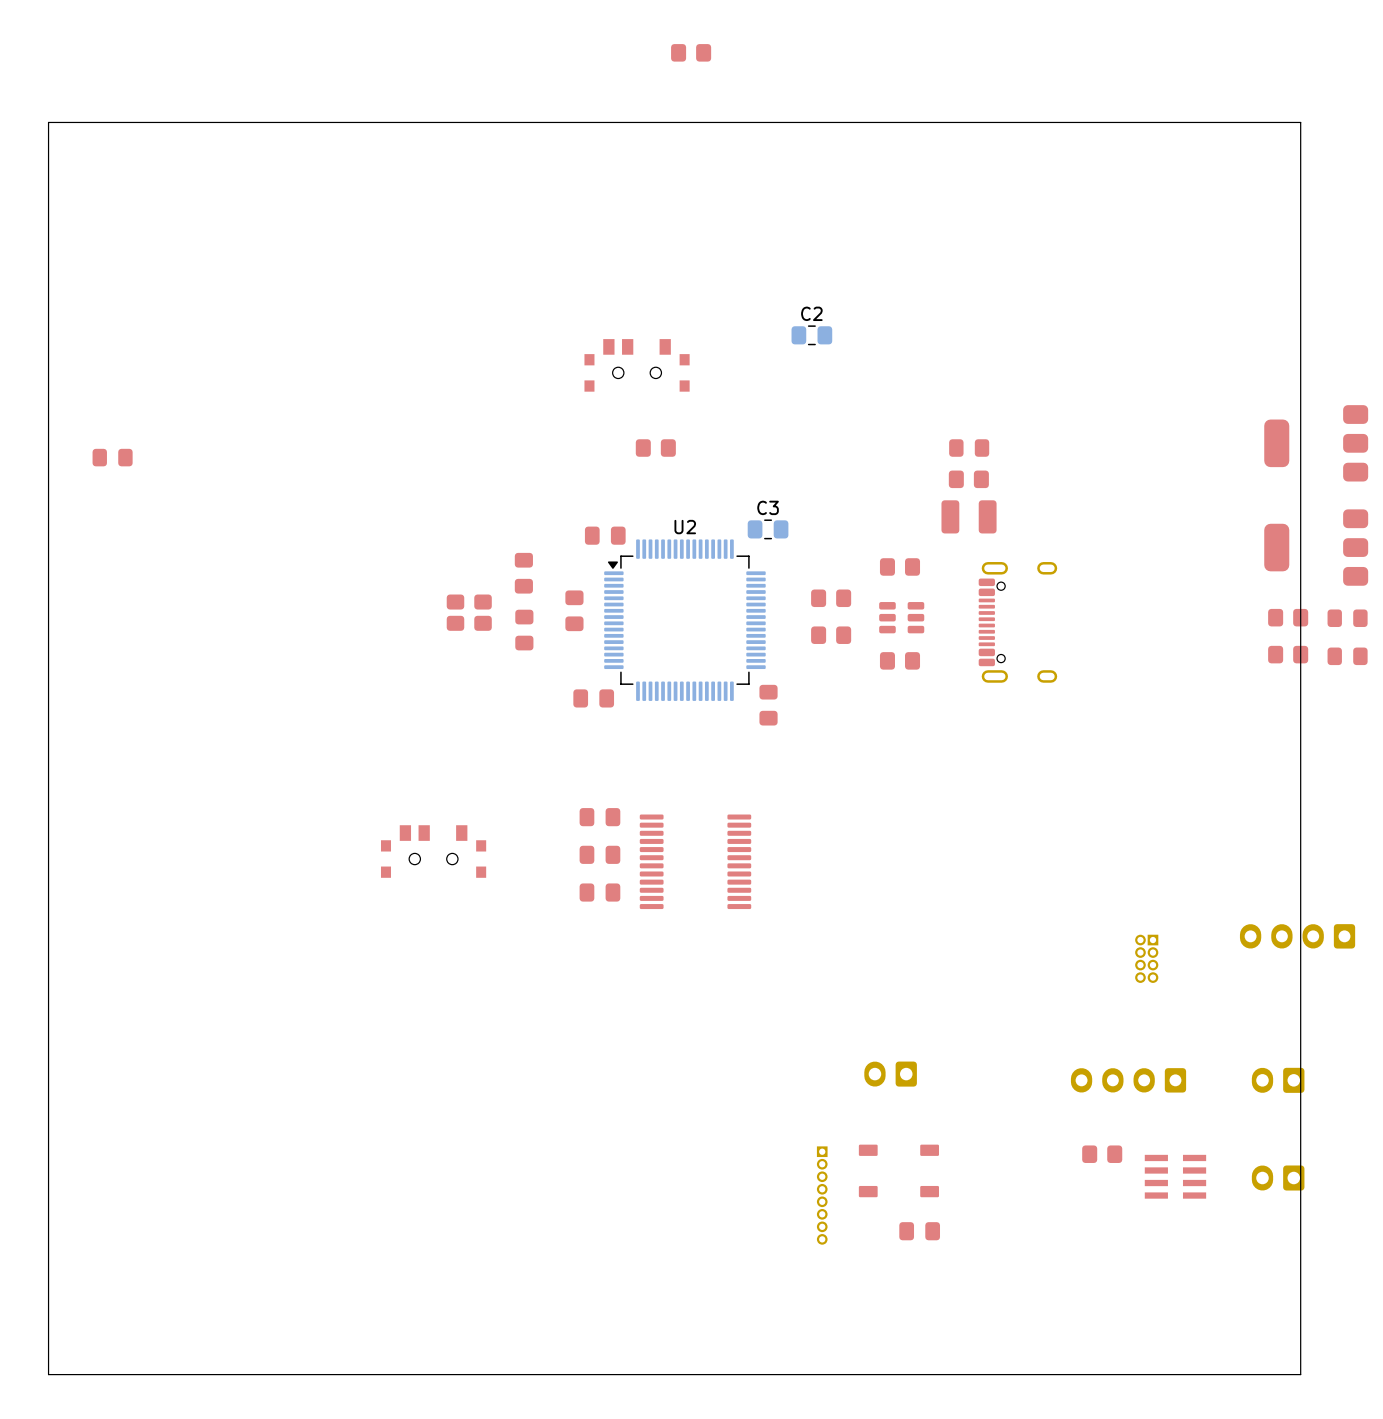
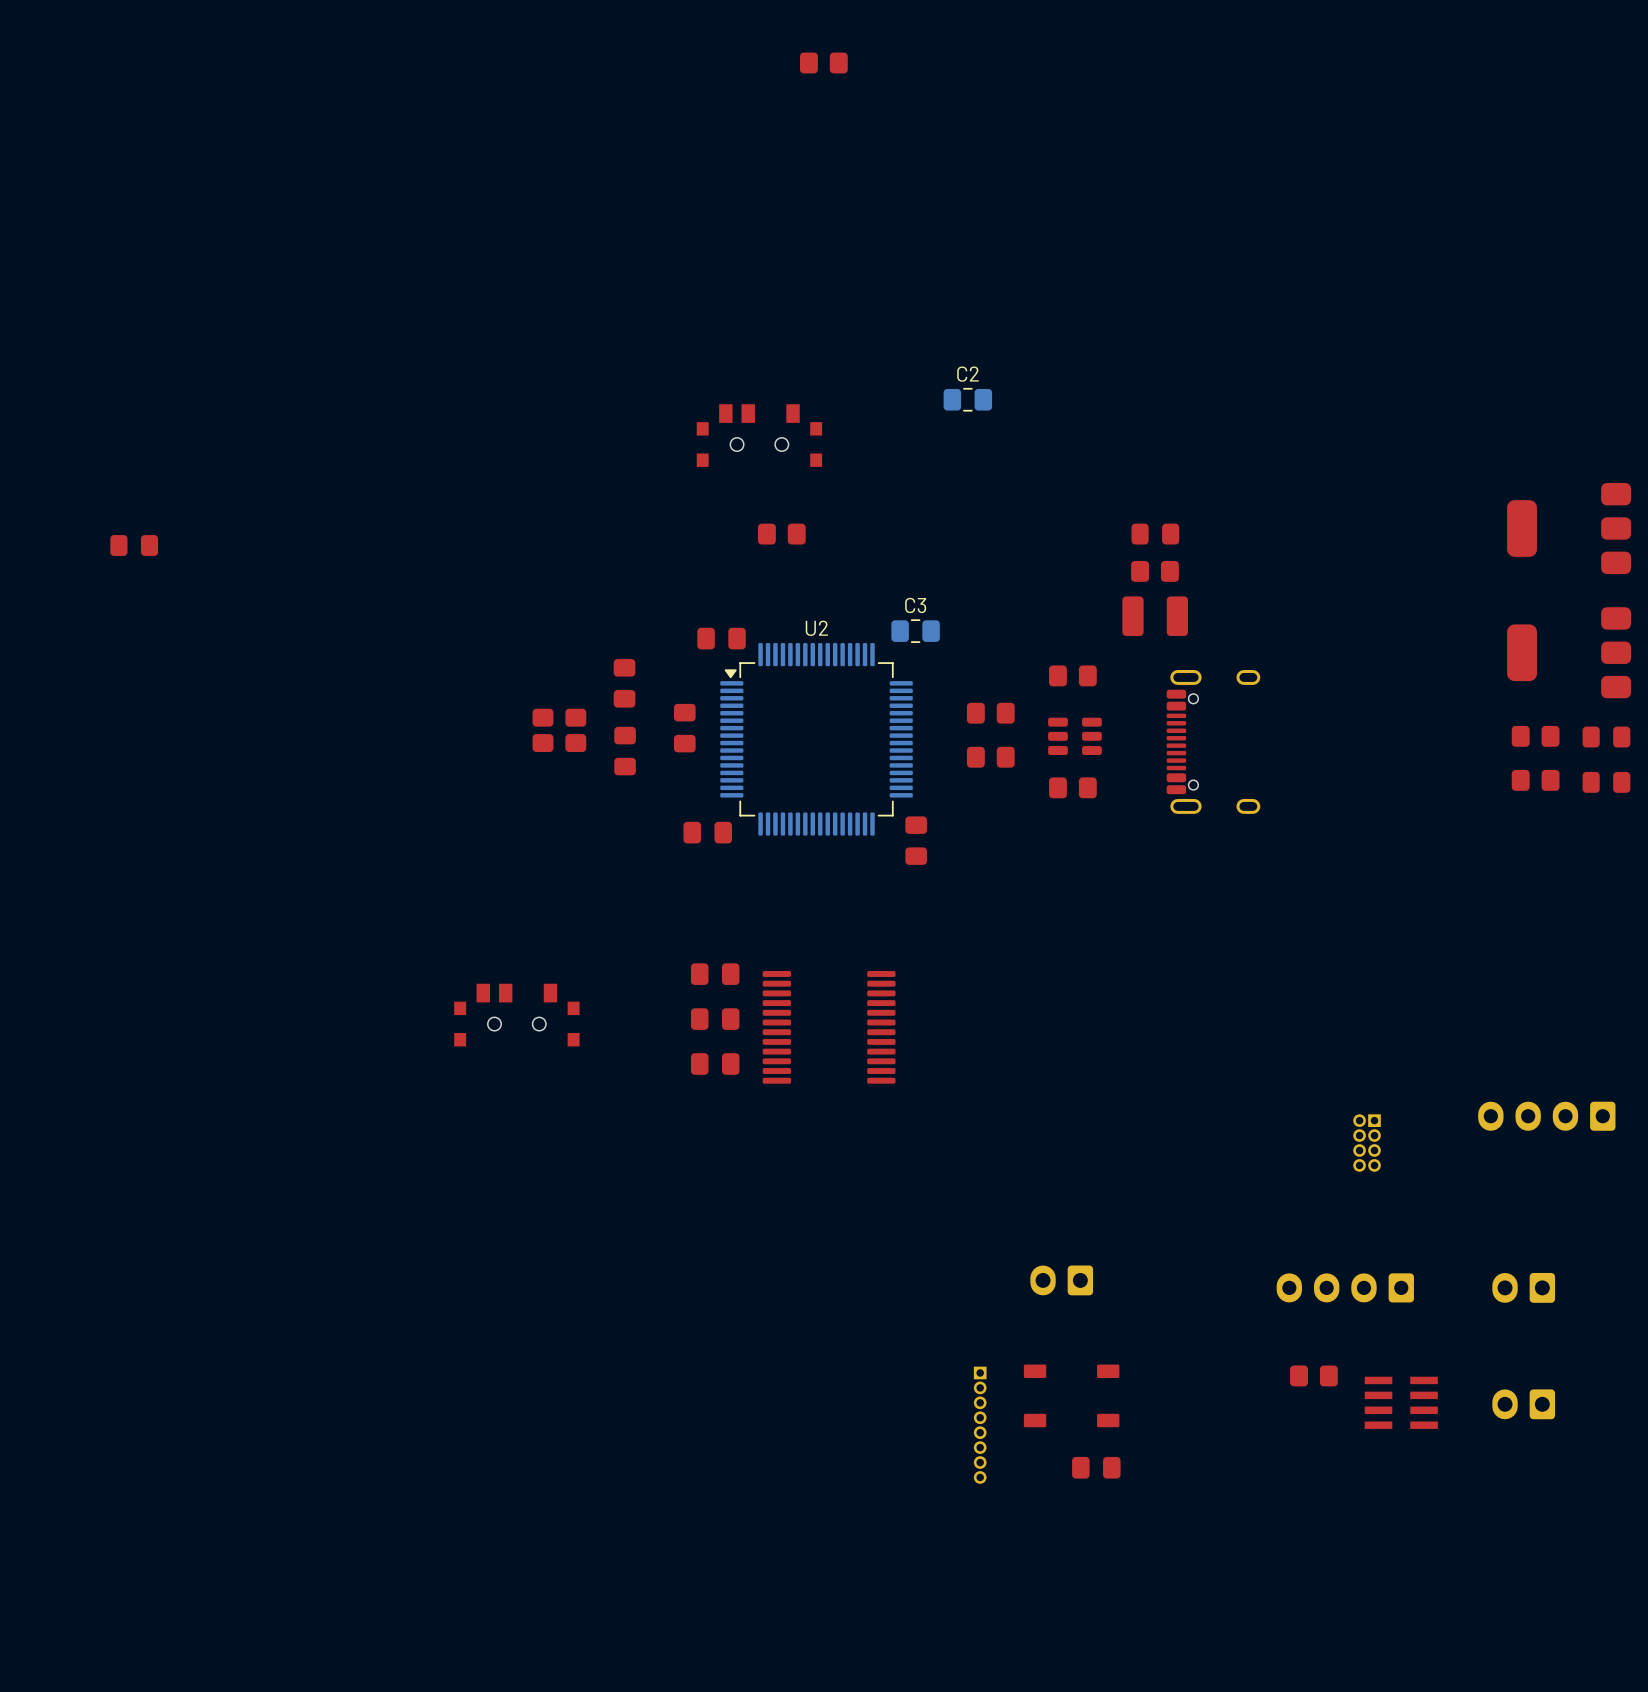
board edge: (1300, 122) (48, 122) (48, 1374) (1300, 1374) (1300, 122) -> none

